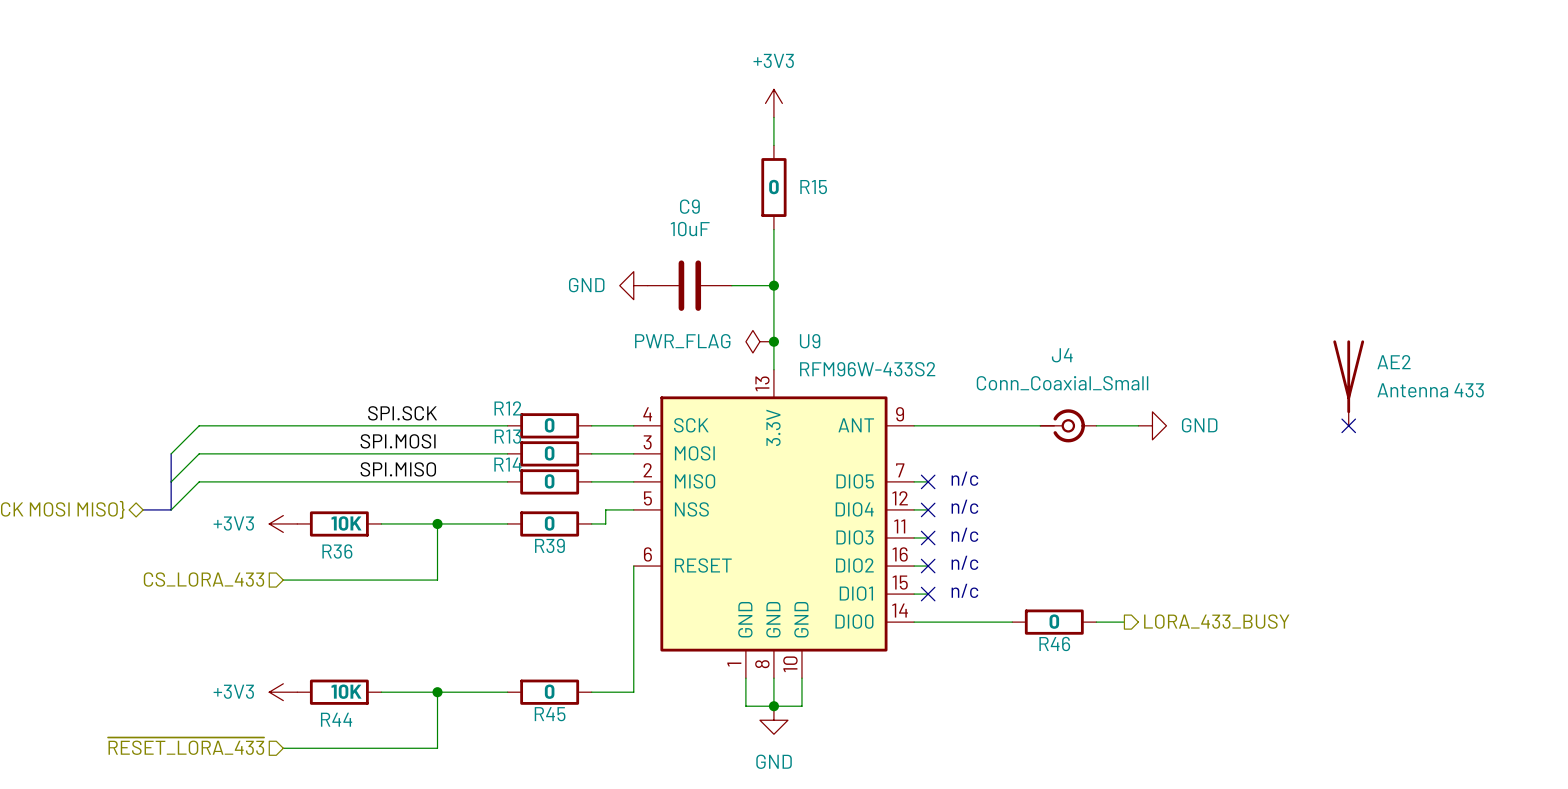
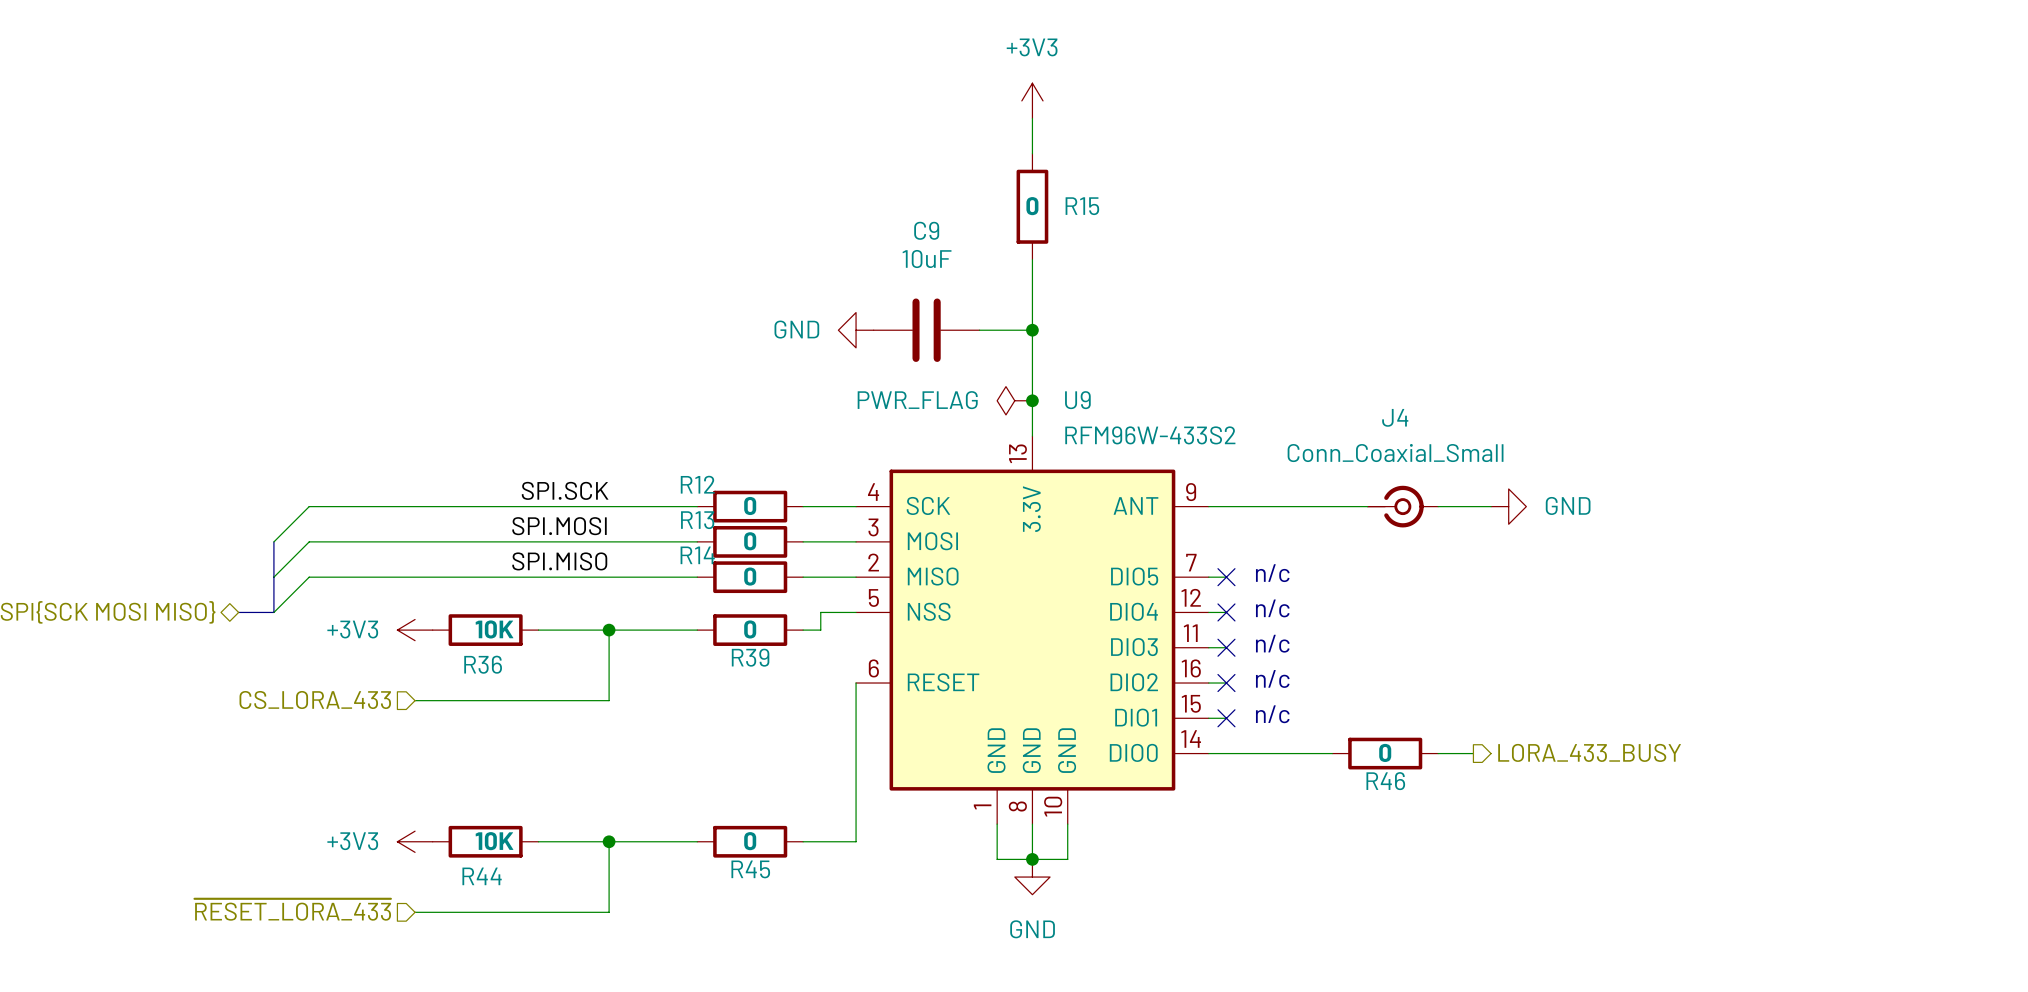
AE2: Antenna 433 (1348, 383) -> none
no-connect mark: (1348, 425) -> none

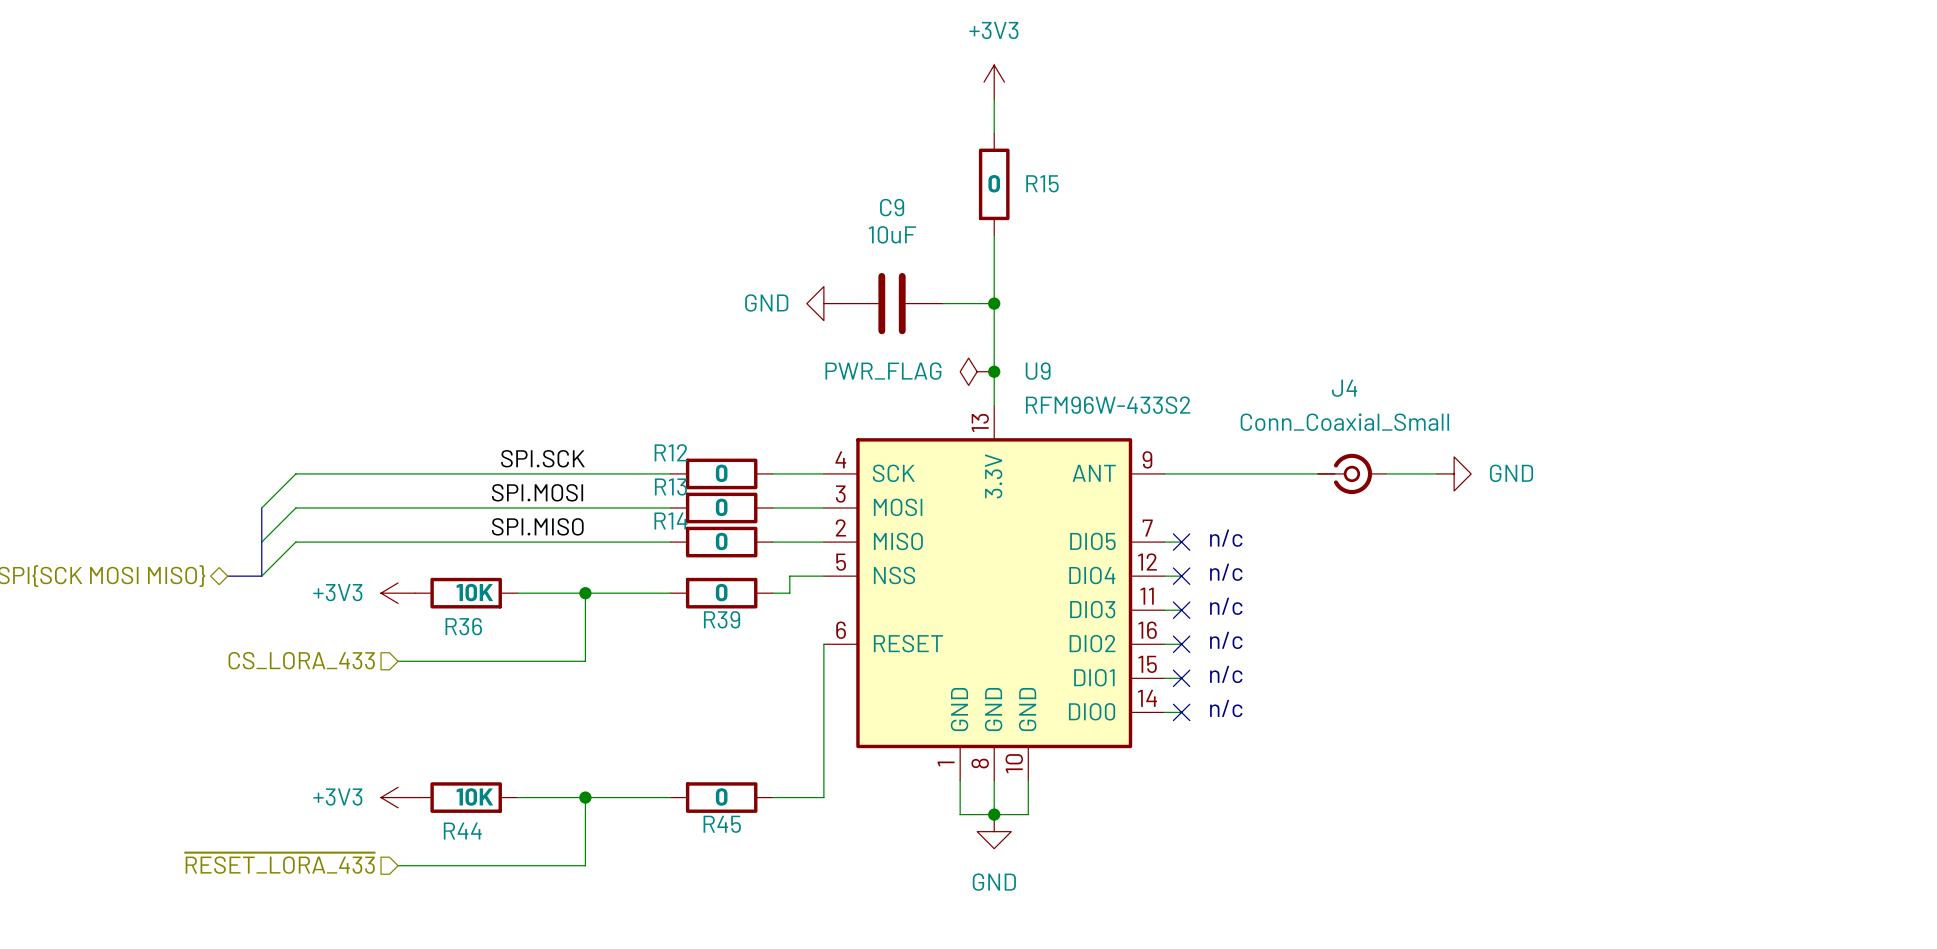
text: none -> n/c (1226, 708)
hierarchical label: LORA_433_BUSY (1589, 752) -> none
wire: (1226, 753) (1332, 753) -> none
no-connect mark: none -> (1181, 712)
R46: 0 (1385, 753) -> none
wire: (1438, 753) (1473, 753) -> none

